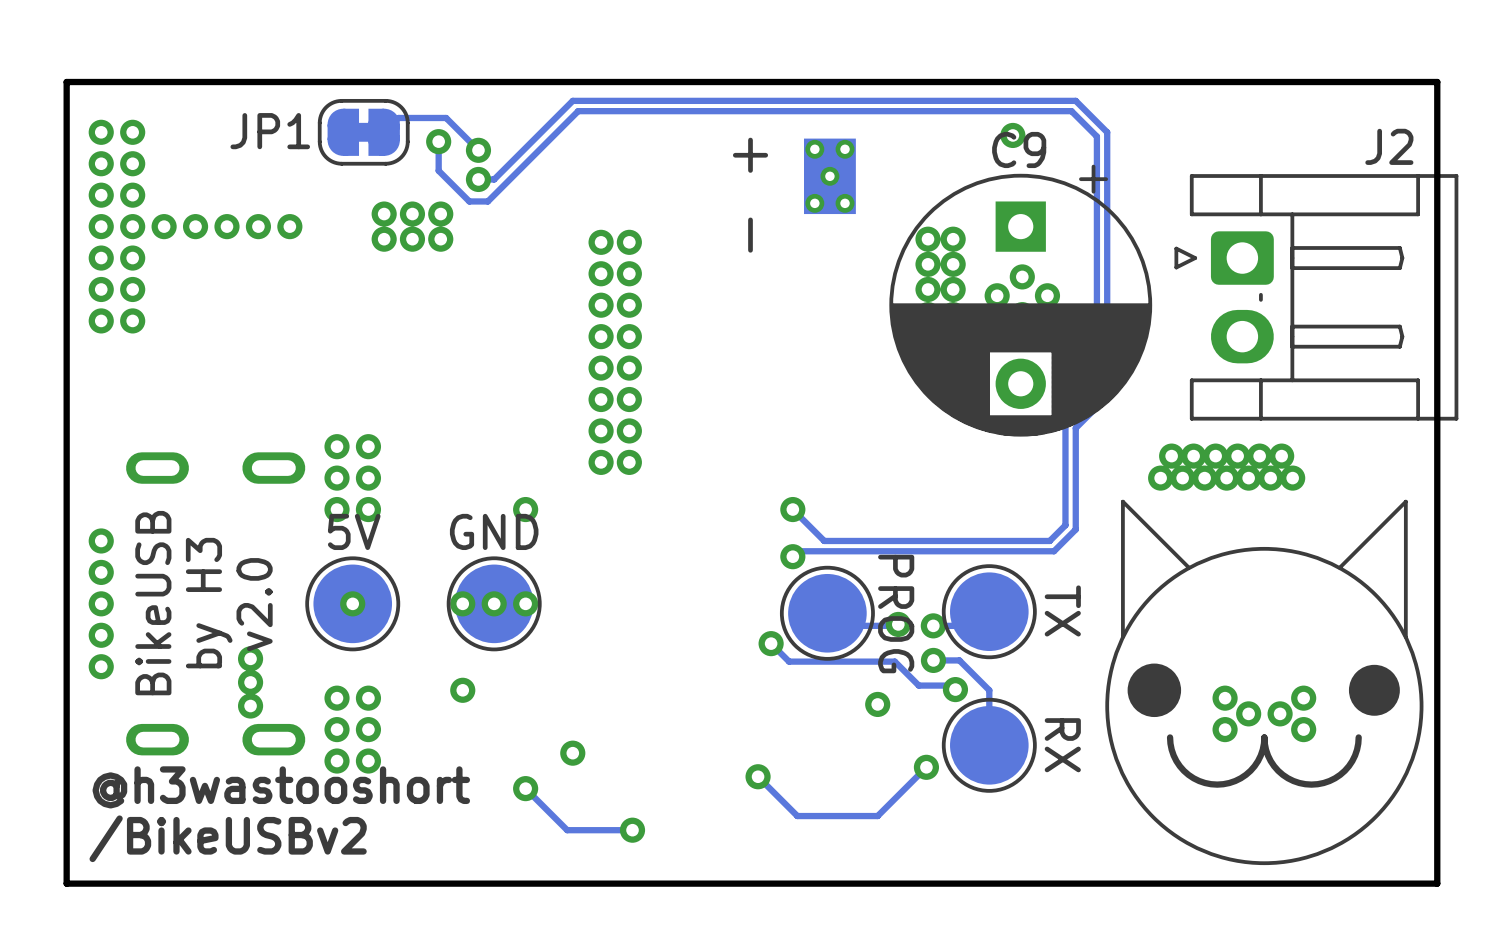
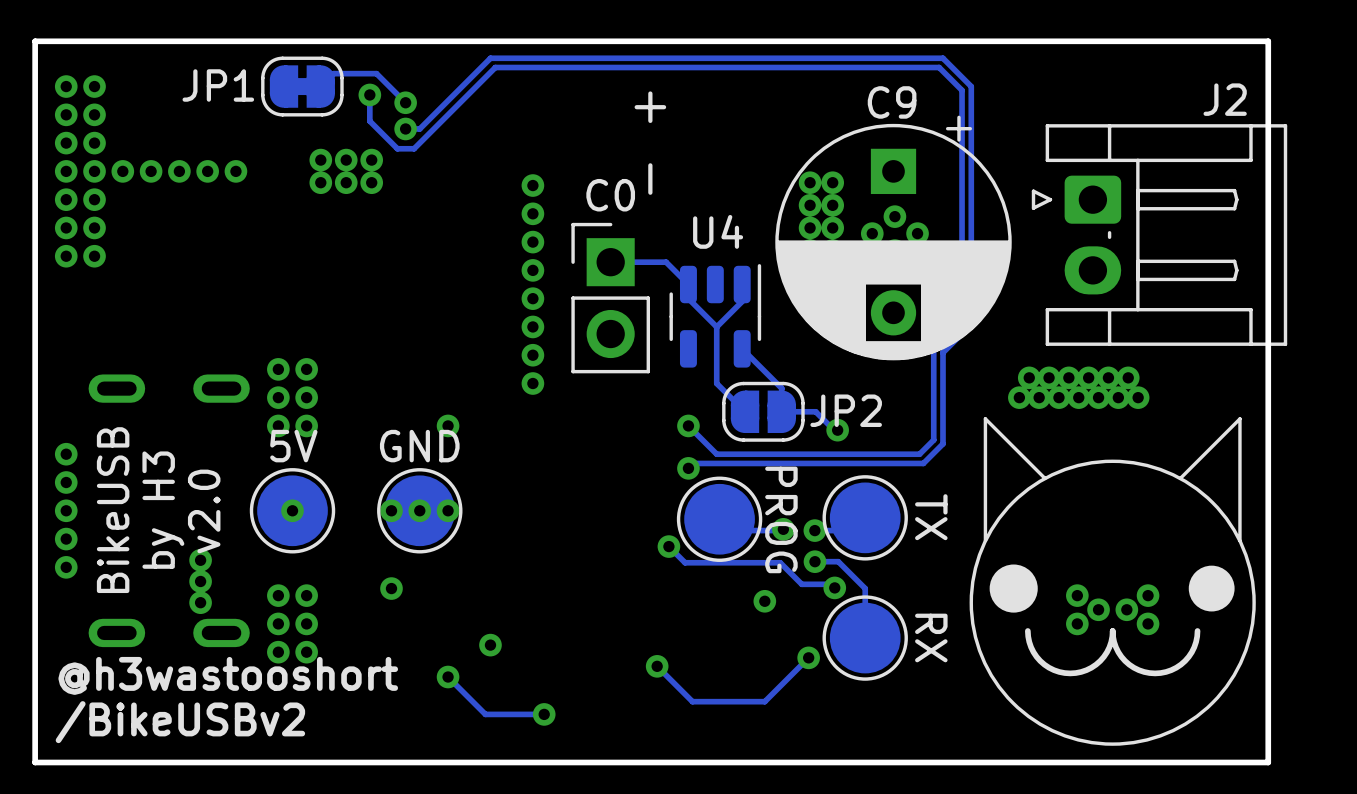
via: (1012, 135) -> none
part: (829, 176) -> none
via: (601, 242) -> none
via: none -> (532, 185)
via: (629, 242) -> none
via: (601, 273) -> none
via: none -> (532, 213)
via: (629, 273) -> none
via: (601, 305) -> none
via: none -> (532, 242)
via: (629, 305) -> none
track: none -> (610, 262) (666, 262) (688, 284) (688, 298) (716, 326)
via: (601, 336) -> none
via: none -> (532, 270)
via: (629, 336) -> none
track: none -> (742, 284) (742, 301) (716, 326)
C0: none -> (610, 298)
via: (601, 368) -> none
via: none -> (532, 298)
via: (629, 368) -> none
U4: none -> (715, 315)
via: (601, 399) -> none
via: none -> (532, 326)
via: (629, 399) -> none
track: none -> (716, 326) (716, 383) (745, 411) (745, 396)
track: none -> (742, 348) (781, 388) (781, 411) (815, 411) (834, 430) (837, 430)
via: (601, 430) -> none
via: none -> (532, 355)
via: (629, 430) -> none
via: (601, 462) -> none
via: none -> (532, 383)
via: (629, 462) -> none
JP2: none -> (763, 411)
via: none -> (837, 430)

